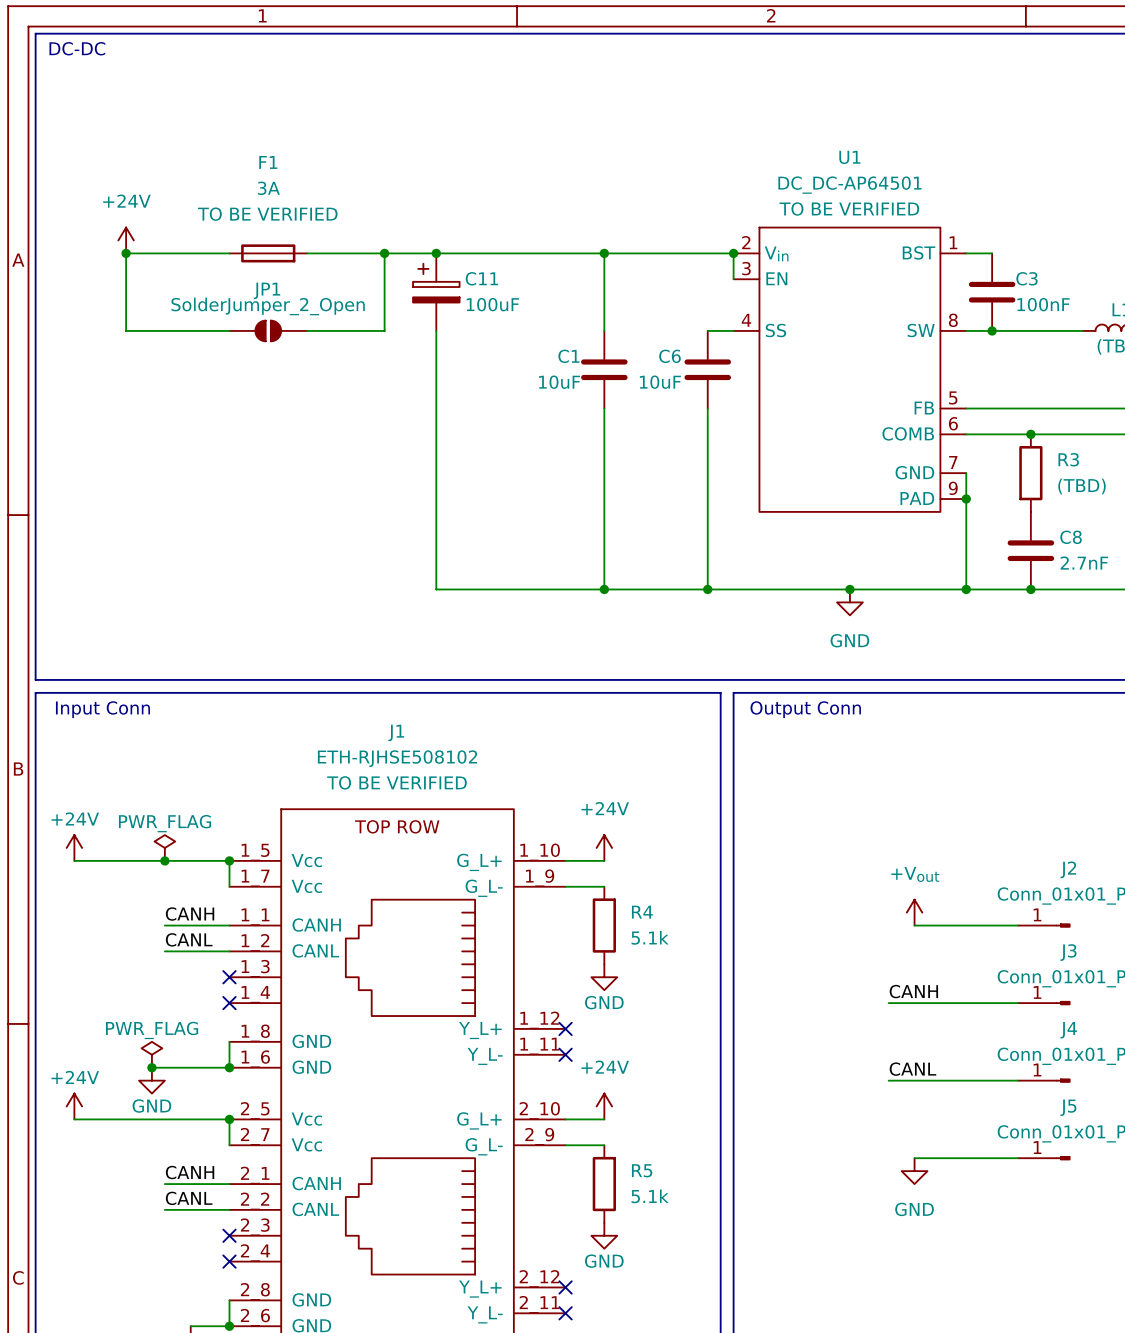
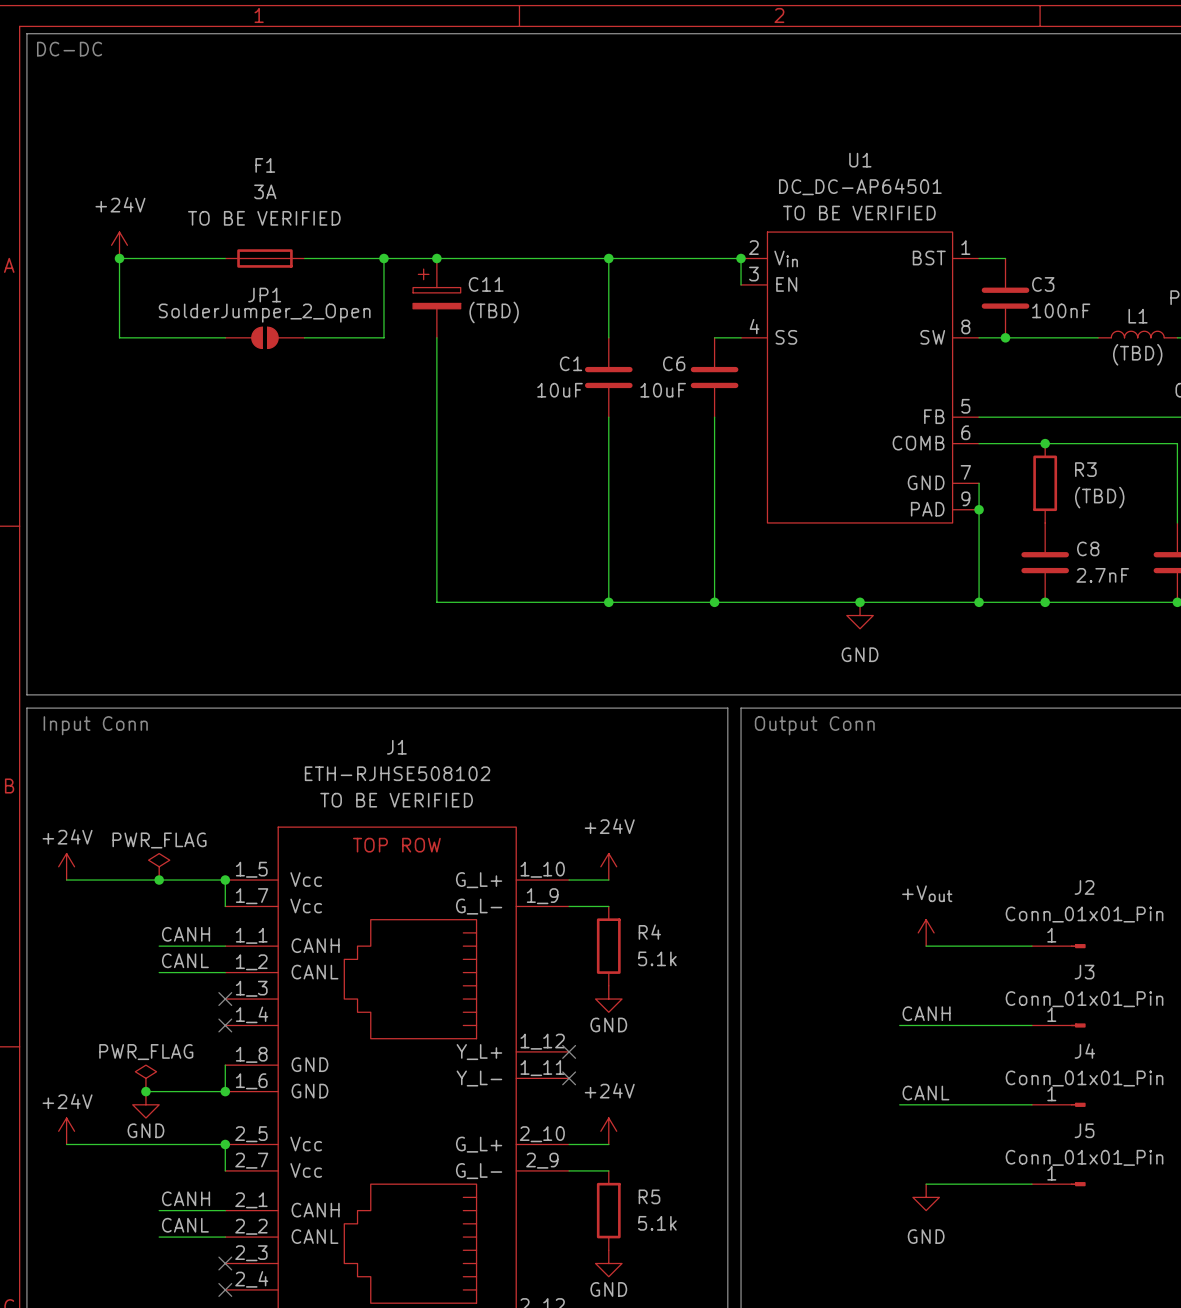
C11 value: 100uF (492, 304) -> (TBD) (494, 312)

